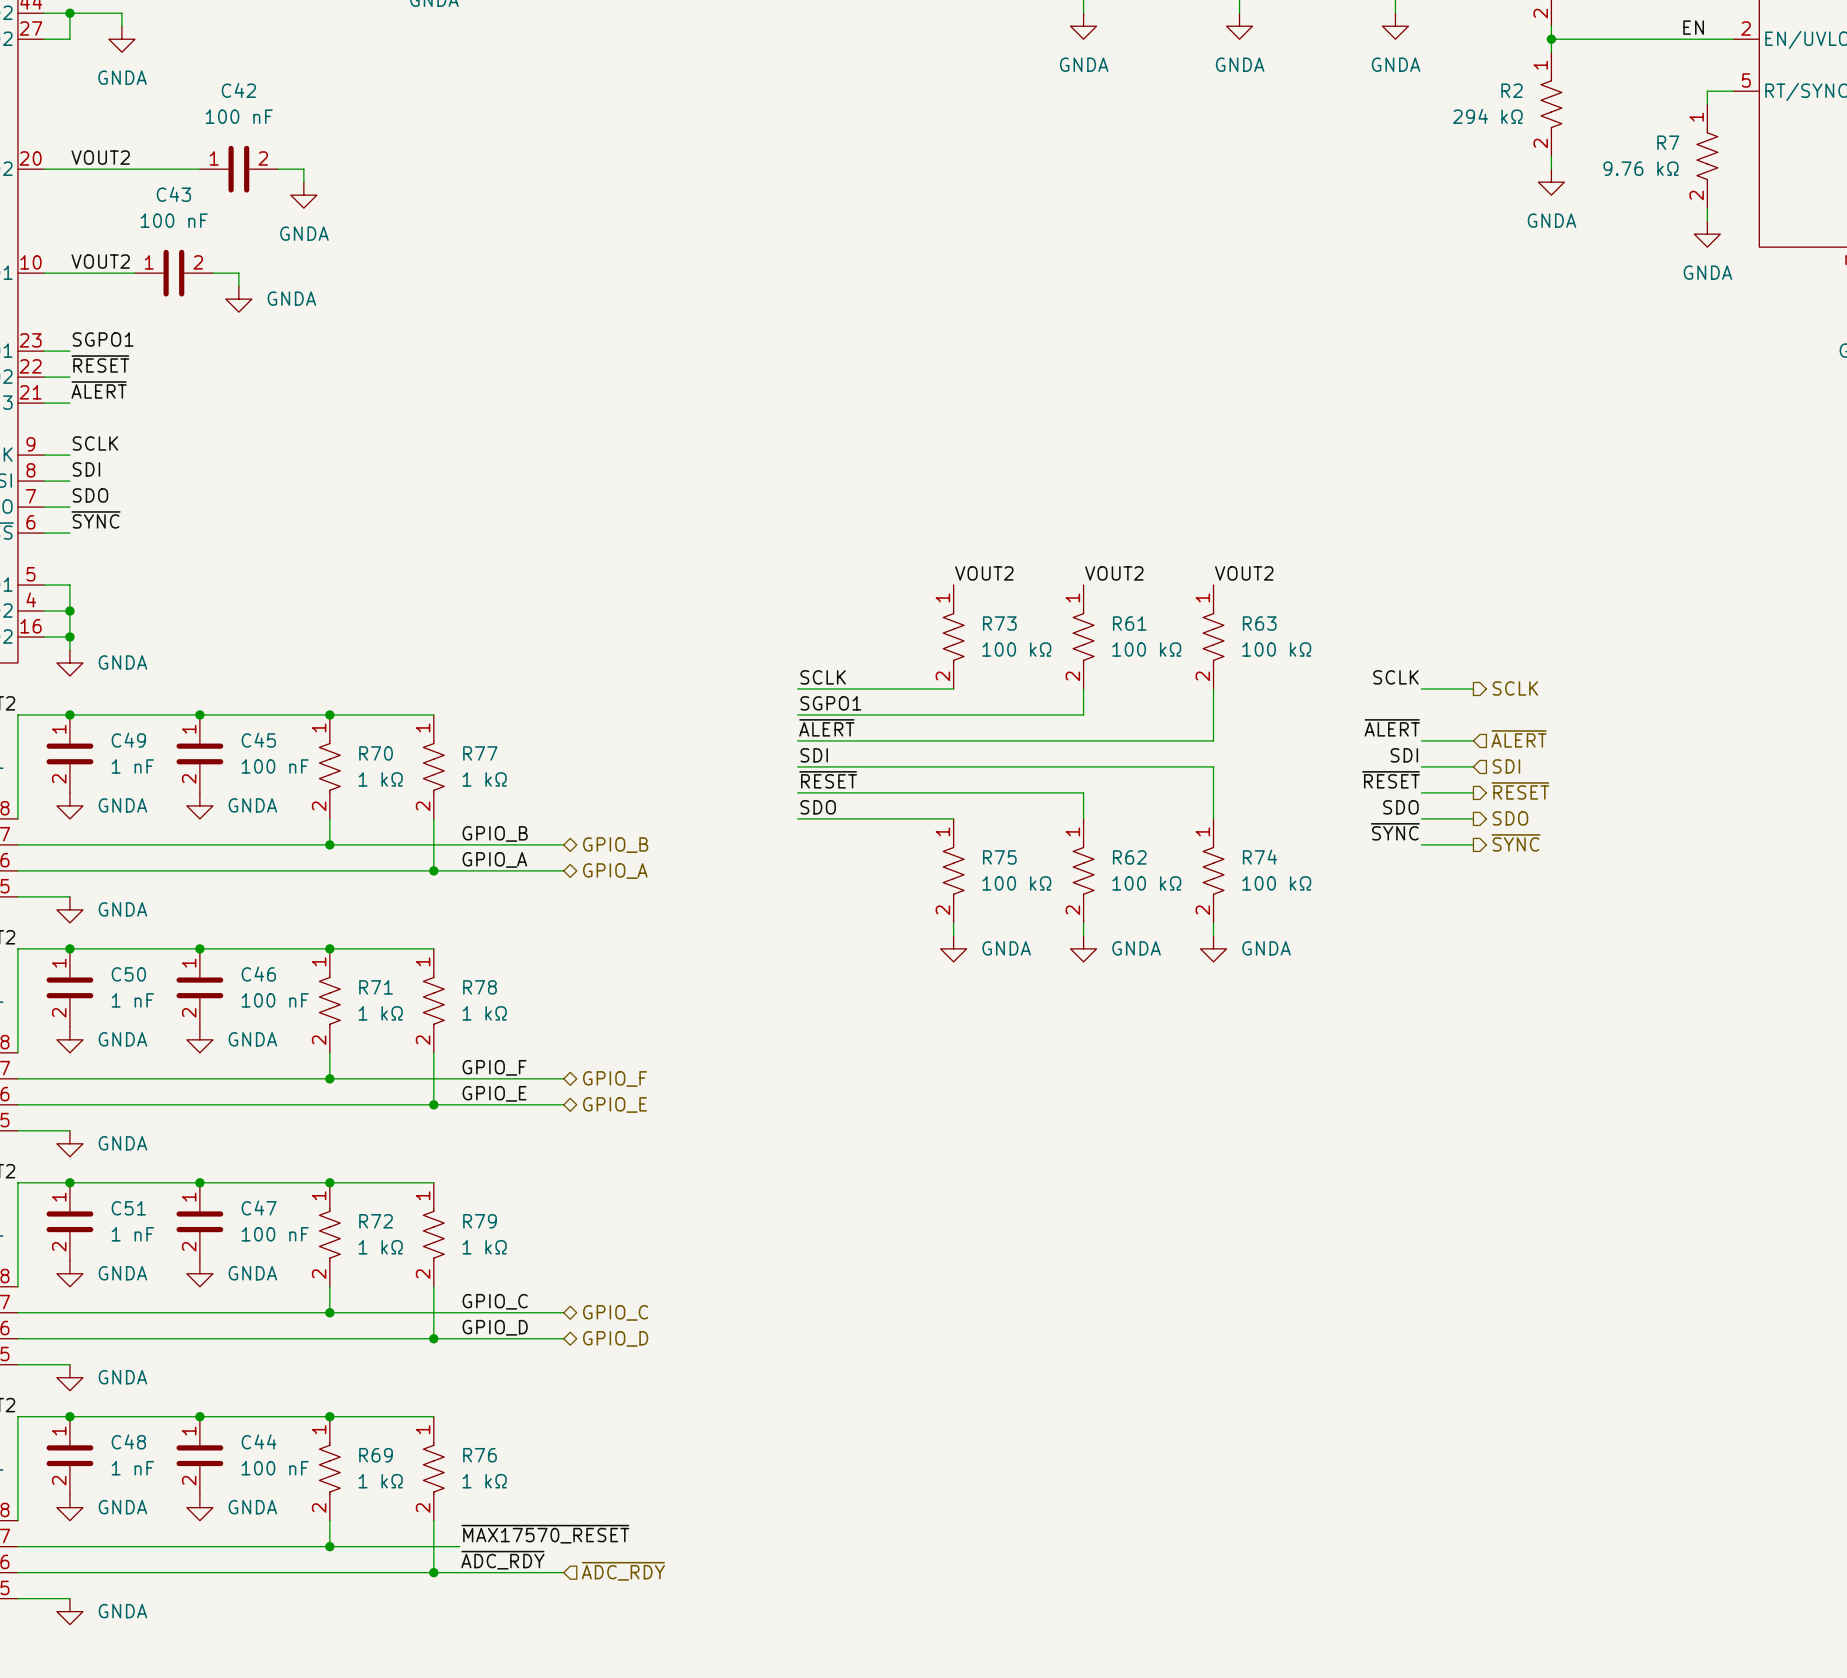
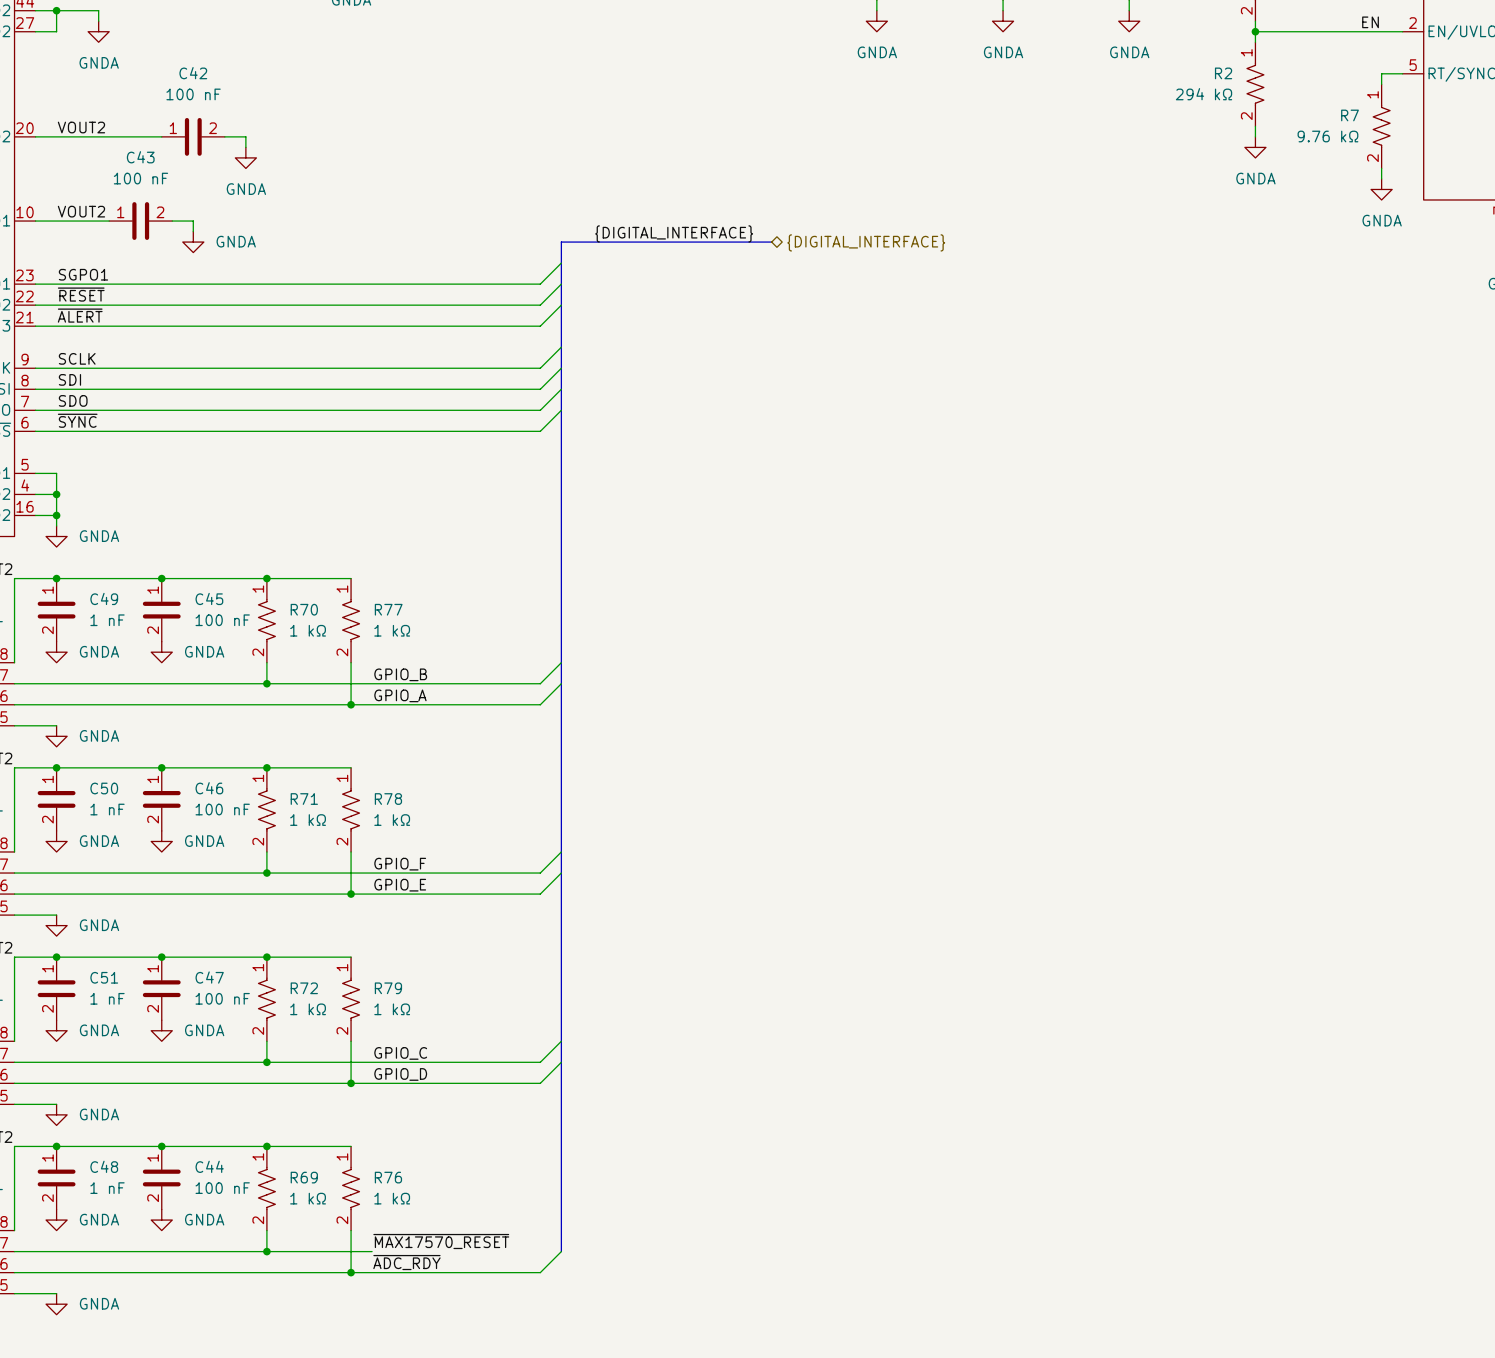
label: none -> {DIGITAL_INTERFACE} (674, 233)
bus: none -> (771, 242) (561, 242) (561, 1251)
hierarchical label: none -> {DIGITAL_INTERFACE} (866, 242)
wire: none -> (561, 263) (540, 284) (56, 284)
wire: none -> (561, 284) (540, 305) (56, 305)
wire: none -> (561, 305) (540, 326) (56, 326)
wire: none -> (561, 347) (540, 368) (56, 368)
wire: none -> (561, 368) (540, 389) (56, 389)
wire: none -> (561, 389) (540, 410) (56, 410)
wire: none -> (561, 410) (540, 431) (56, 431)
label: VOUT2 (984, 573) -> none
label: VOUT2 (1114, 573) -> none
label: VOUT2 (1244, 573) -> none
R73: 100 kΩ (953, 637) -> none
R61: 100 kΩ (1083, 637) -> none
R63: 100 kΩ (1213, 637) -> none
label: SCLK (823, 677) -> none
label: SCLK (1395, 677) -> none
wire: (797, 688) (953, 688) -> none
wire: (1083, 688) (1083, 714) (797, 714) -> none
wire: (1213, 688) (1213, 740) (797, 740) -> none
wire: (1421, 688) (1473, 688) -> none
hierarchical label: SCLK (1515, 688) -> none
label: SGPO1 (830, 703) -> none
label: ~{ALERT} (826, 727) -> none
label: ~{ALERT} (1392, 727) -> none
hierarchical label: ~{ALERT} (1519, 738) -> none
wire: (1421, 740) (1473, 740) -> none
label: SDI (814, 755) -> none
label: SDI (1404, 755) -> none
wire: (797, 766) (1213, 766) (1213, 818) -> none
wire: (1421, 766) (1473, 766) -> none
hierarchical label: SDI (1506, 766) -> none
label: ~{RESET} (828, 779) -> none
label: ~{RESET} (1391, 779) -> none
hierarchical label: ~{RESET} (1520, 790) -> none
wire: (797, 792) (1083, 792) (1083, 818) -> none
wire: (1421, 792) (1473, 792) -> none
label: SDO (818, 807) -> none
label: SDO (1400, 807) -> none
wire: none -> (561, 662) (540, 683) (456, 683)
wire: (797, 818) (953, 818) -> none
wire: (1421, 818) (1473, 818) -> none
hierarchical label: SDO (1510, 818) -> none
label: ~{SYNC} (1395, 831) -> none
hierarchical label: ~{SYNC} (1516, 842) -> none
wire: none -> (561, 683) (540, 704) (456, 704)
wire: (1421, 844) (1473, 844) -> none
hierarchical label: GPIO_B (615, 845) -> none
R75: 100 kΩ (953, 870) -> none
R62: 100 kΩ (1083, 870) -> none
R74: 100 kΩ (1213, 870) -> none
hierarchical label: GPIO_A (615, 871) -> none
wire: (953, 922) (953, 935) -> none
wire: (1083, 922) (1083, 935) -> none
wire: (1213, 922) (1213, 935) -> none
power symbol: GNDA (953, 948) -> none
power symbol: GNDA (1083, 948) -> none
power symbol: GNDA (1213, 948) -> none
wire: none -> (561, 851) (540, 873) (456, 873)
hierarchical label: GPIO_F (615, 1078) -> none
wire: none -> (561, 873) (540, 894) (456, 894)
hierarchical label: GPIO_E (615, 1104) -> none
wire: none -> (561, 1041) (540, 1062) (456, 1062)
hierarchical label: GPIO_C (615, 1312) -> none
wire: none -> (561, 1062) (540, 1083) (456, 1083)
hierarchical label: GPIO_D (615, 1338) -> none
wire: none -> (561, 1251) (540, 1272) (456, 1272)
hierarchical label: ~{ADC_RDY} (623, 1571) -> none

